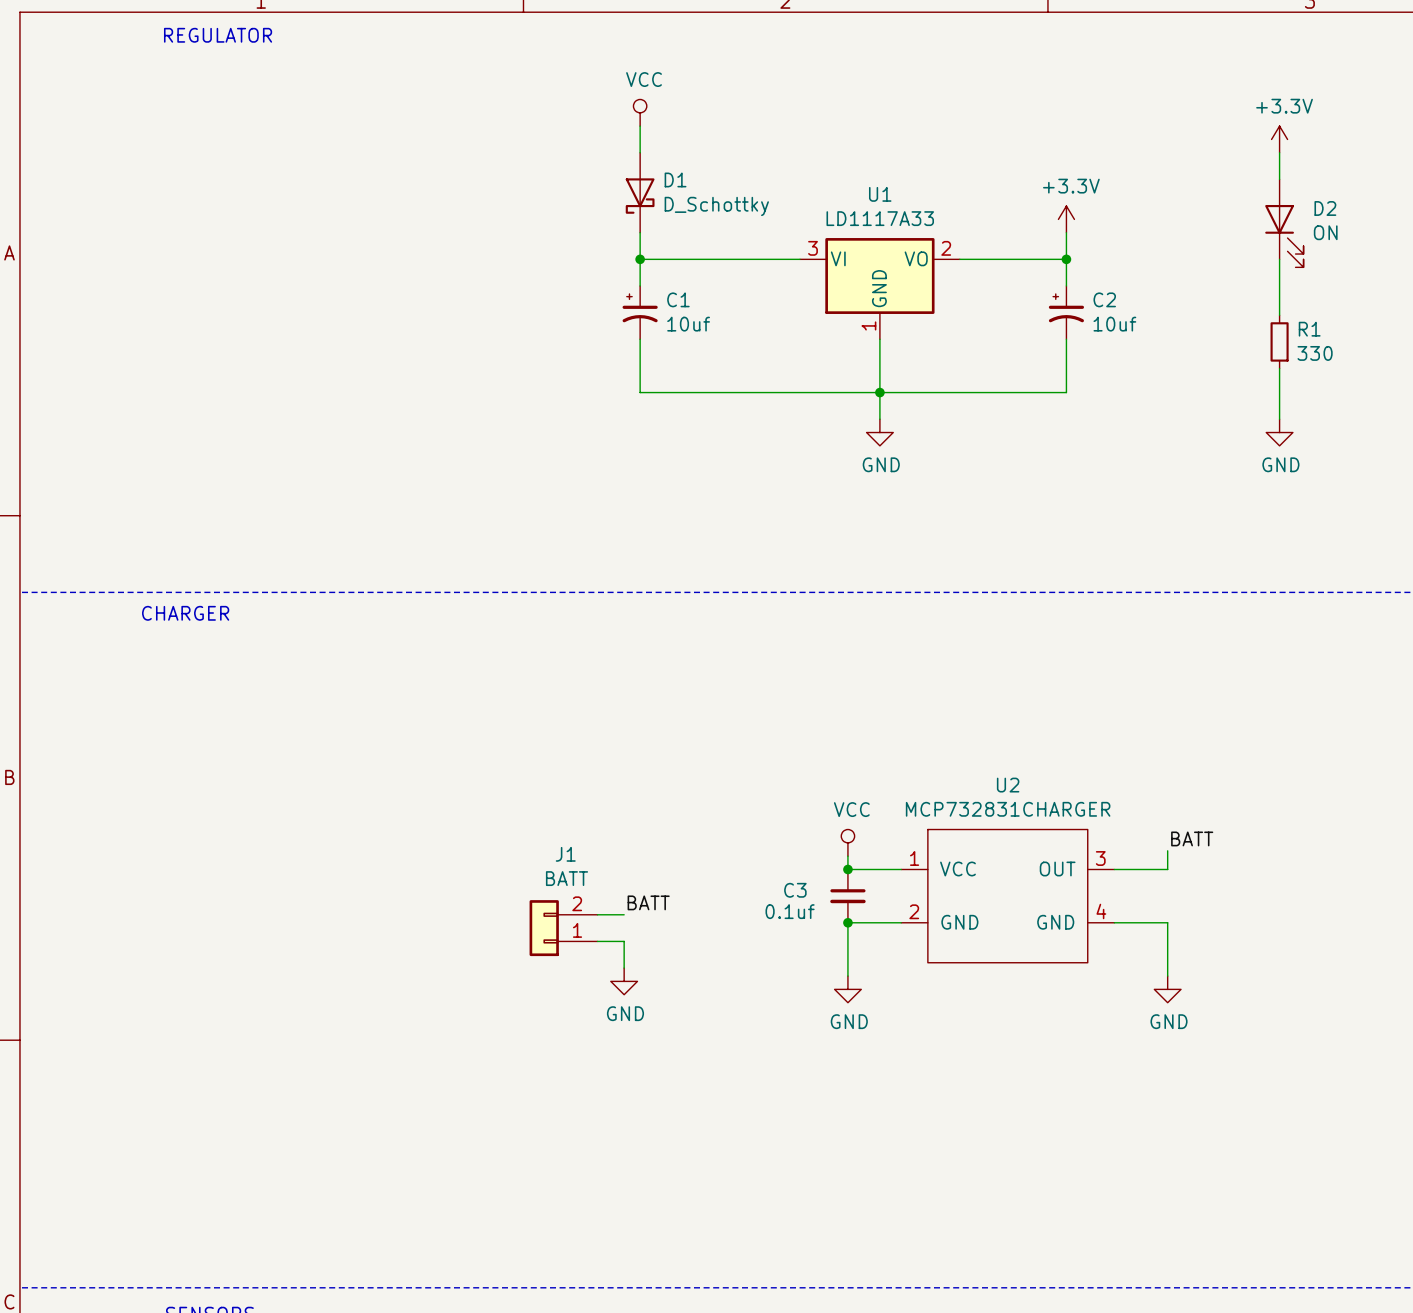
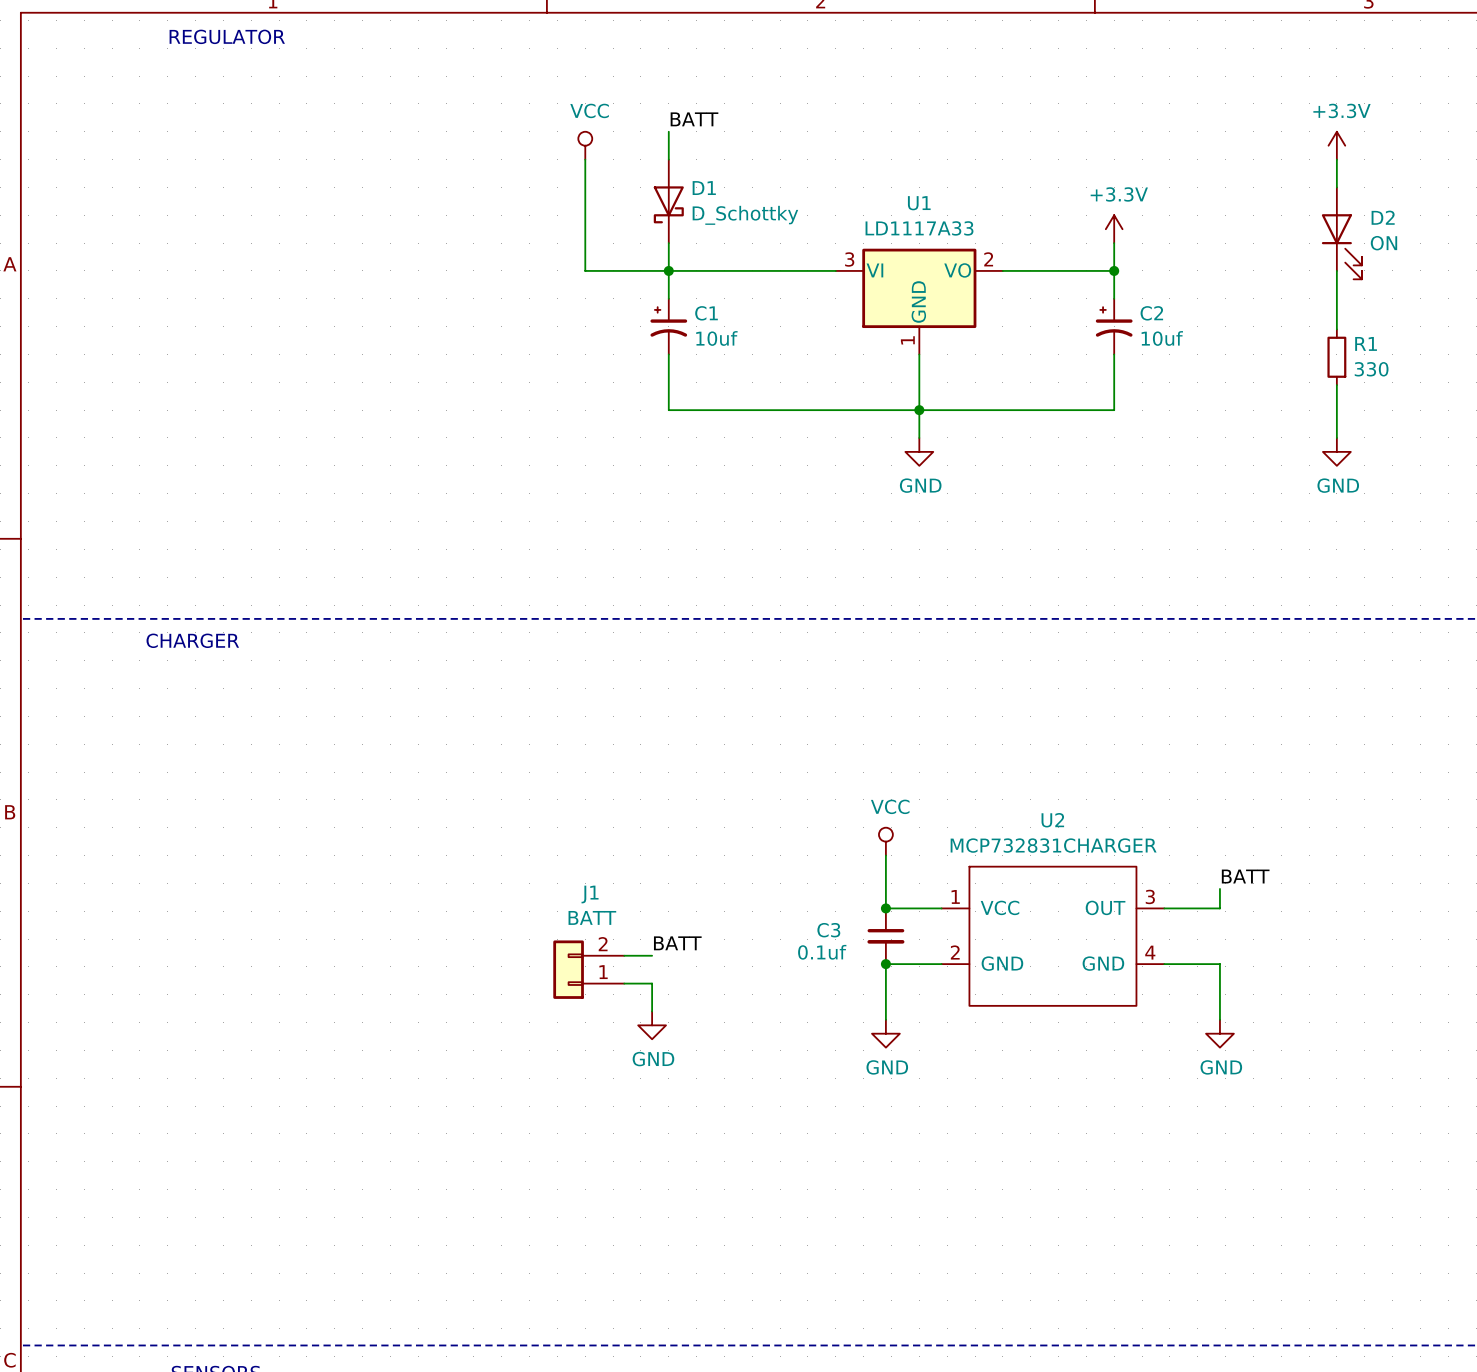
power symbol position: VCC (640, 112) -> VCC (585, 145)
label: none -> BATT (694, 119)
wire: none -> (585, 159) (585, 270) (668, 270)
wire: none -> (885, 855) (885, 894)
power symbol position: VCC (847, 842) -> VCC (885, 841)

